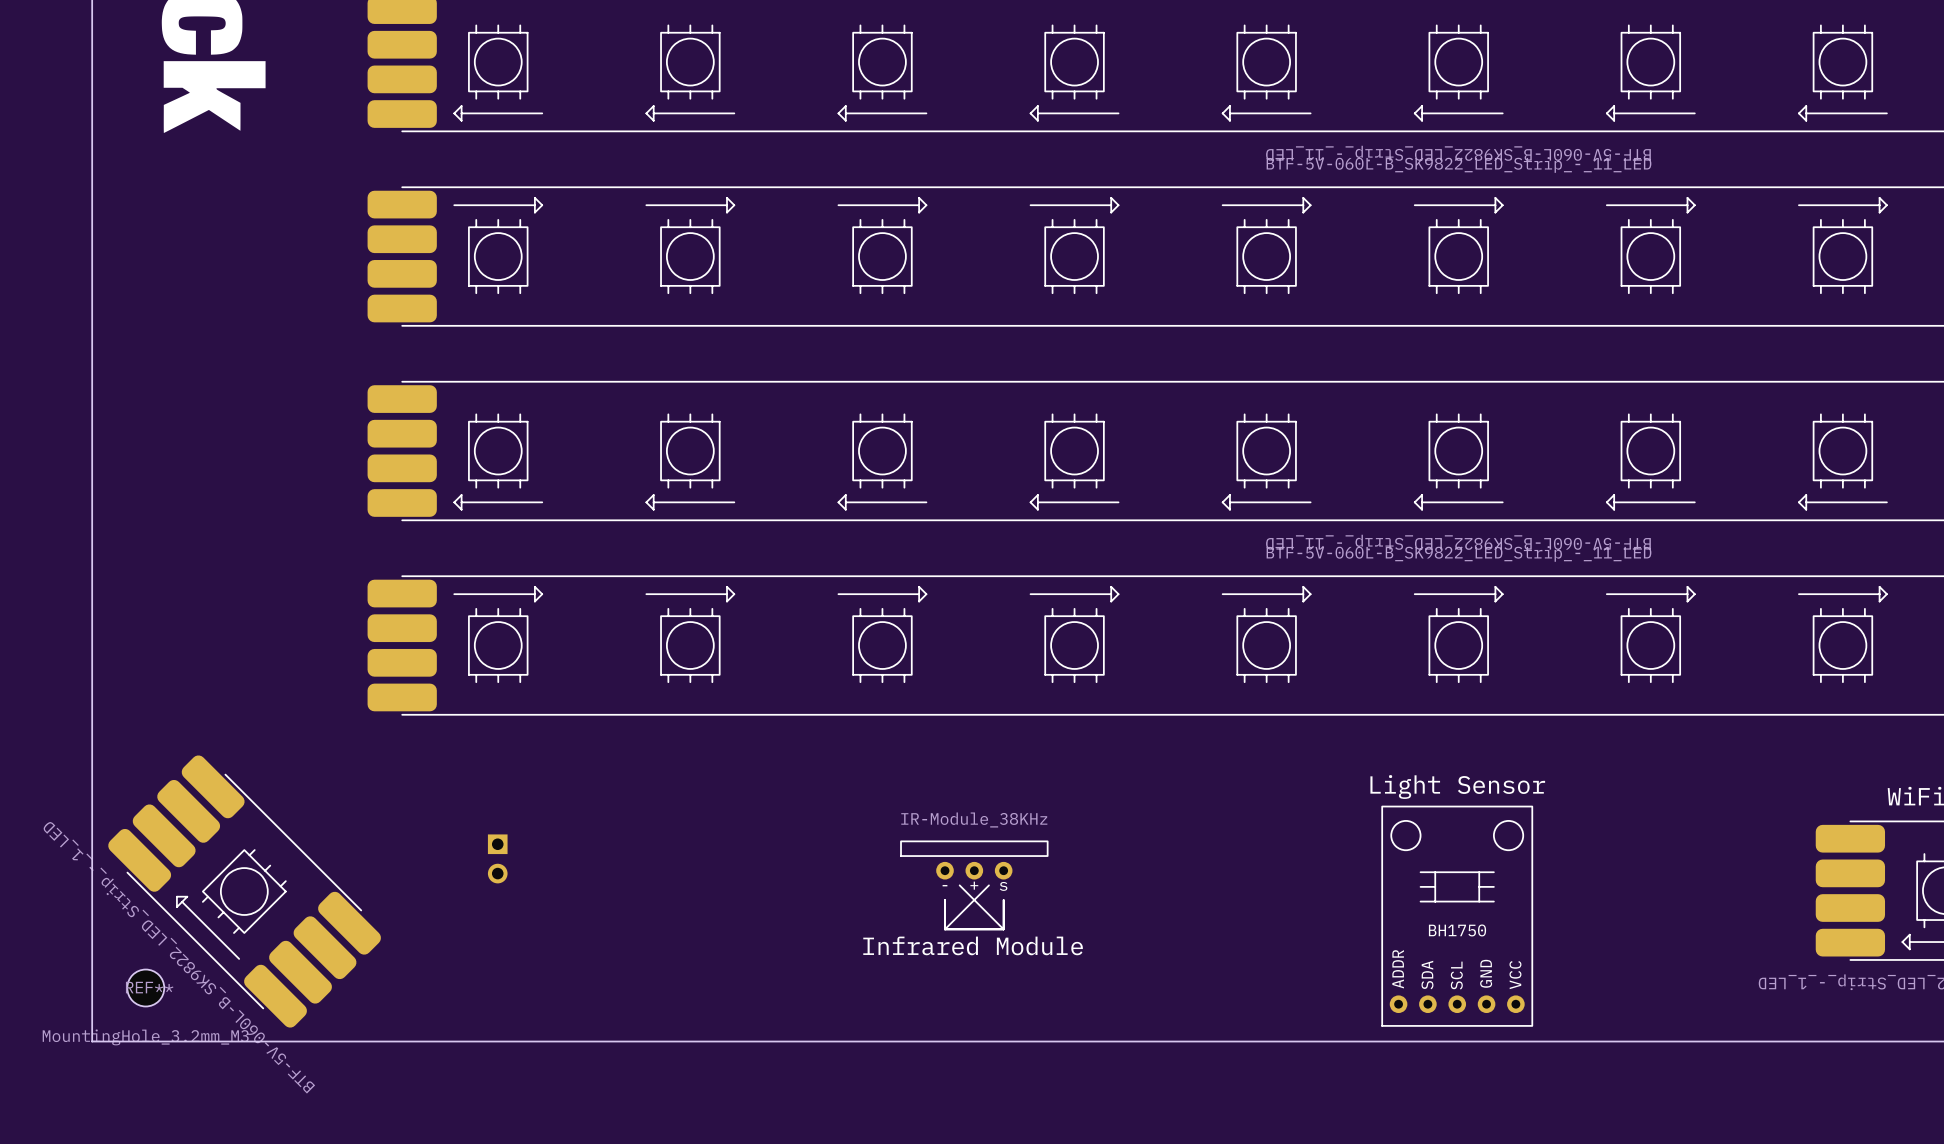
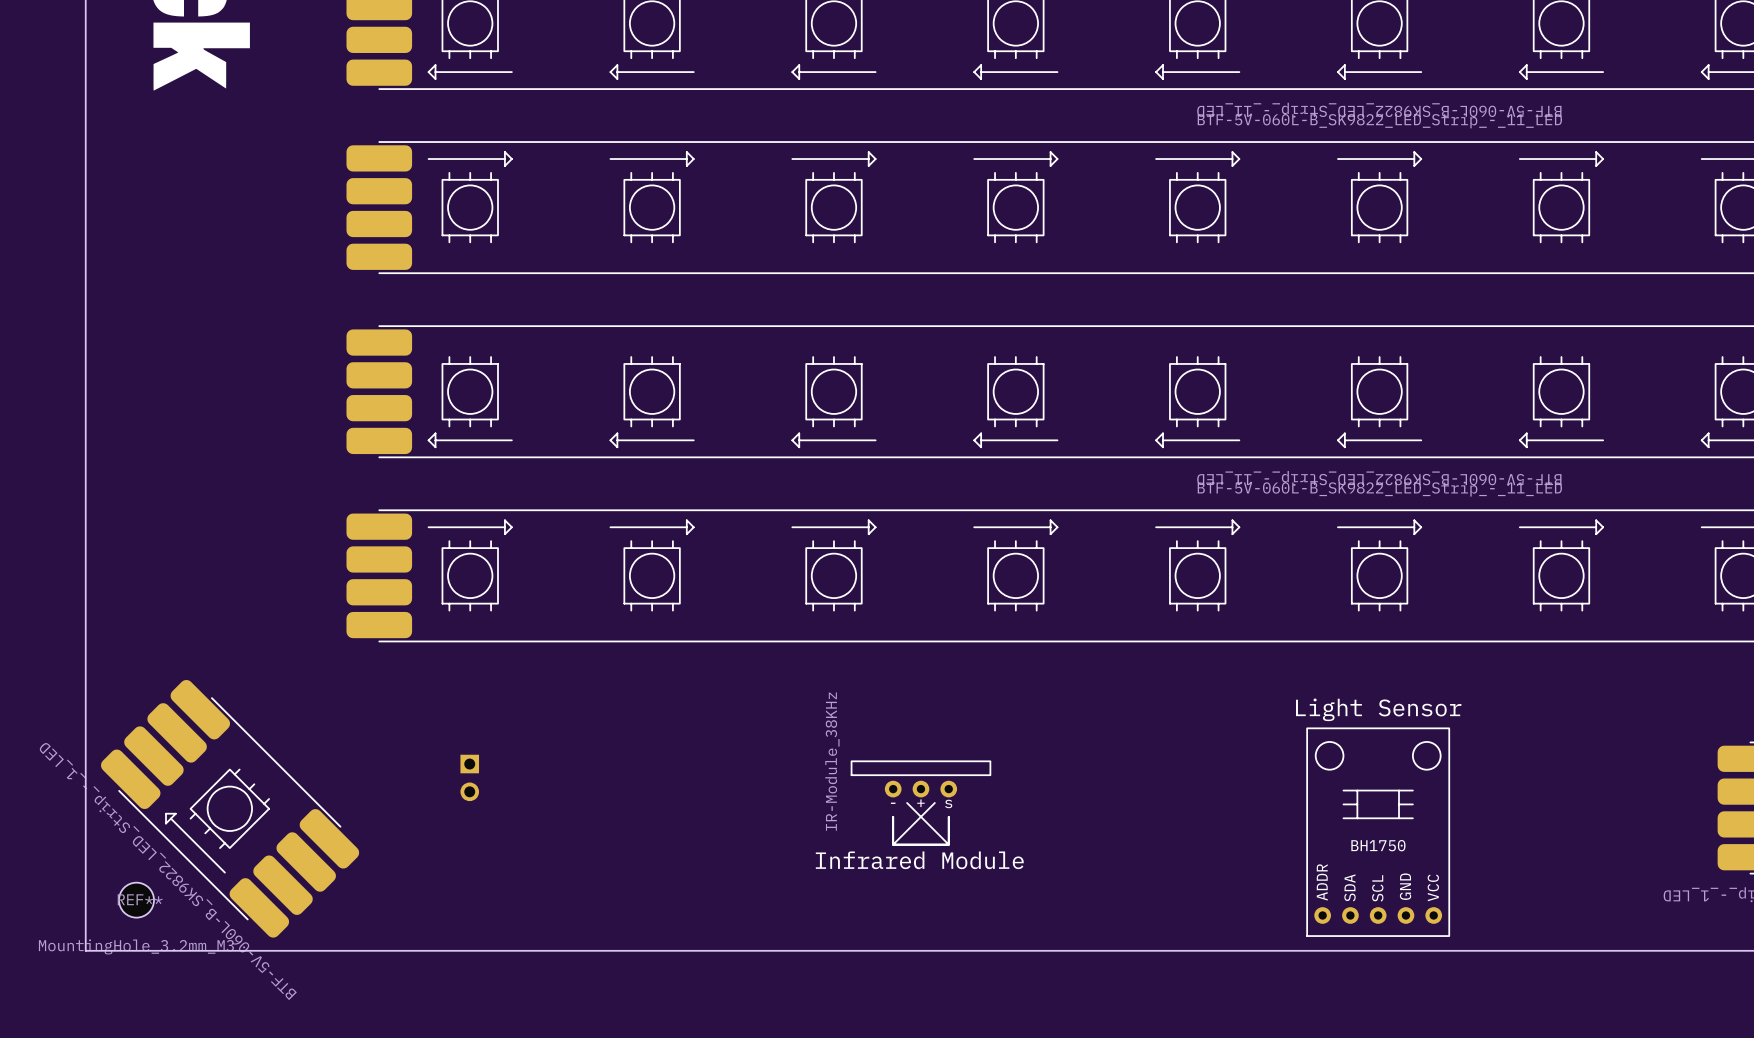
part value rotation: 0° (974, 819) -> 90° counterclockwise (832, 761)

